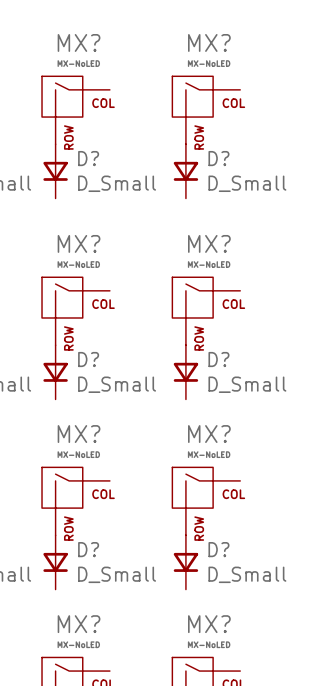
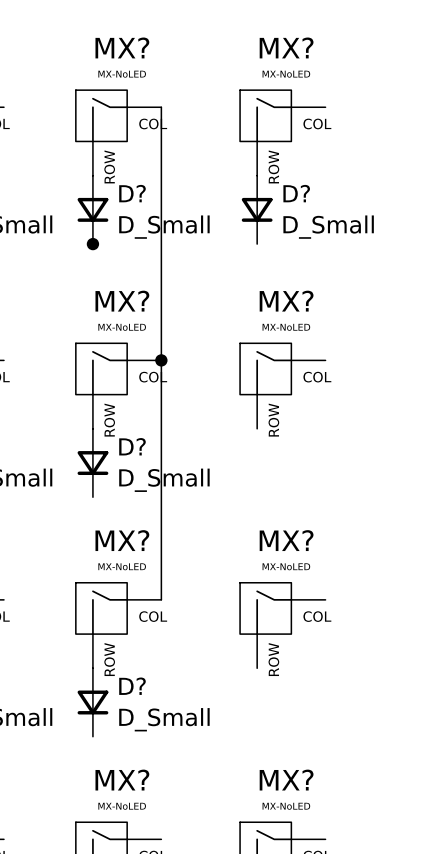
wire: none -> (161, 107) (161, 599)
junction: none -> (92, 244)
junction: none -> (161, 360)
D?: D_Small (185, 372) -> none
D?: D_Small (185, 562) -> none

